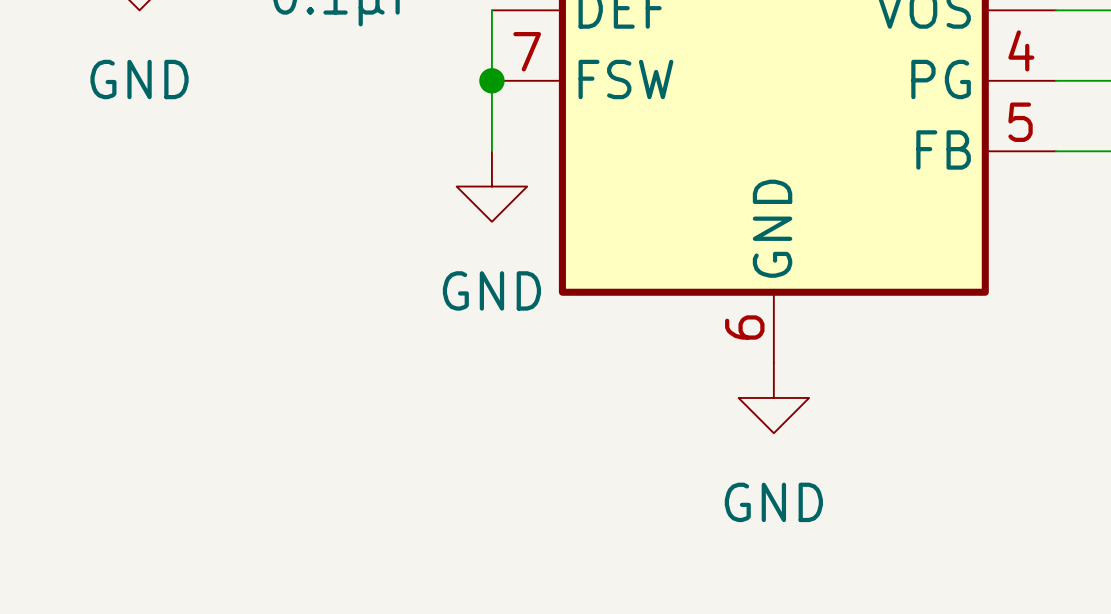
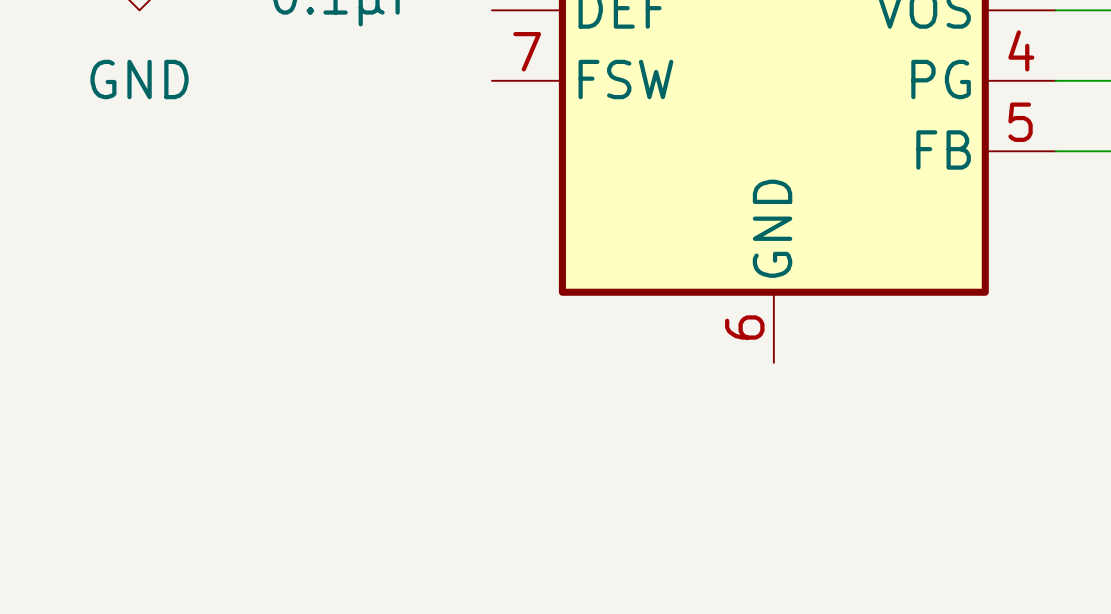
wire: (491, 10) (491, 151) -> none
junction: (491, 80) -> none
power symbol: GND (491, 186) -> none
power symbol: GND (773, 397) -> none

